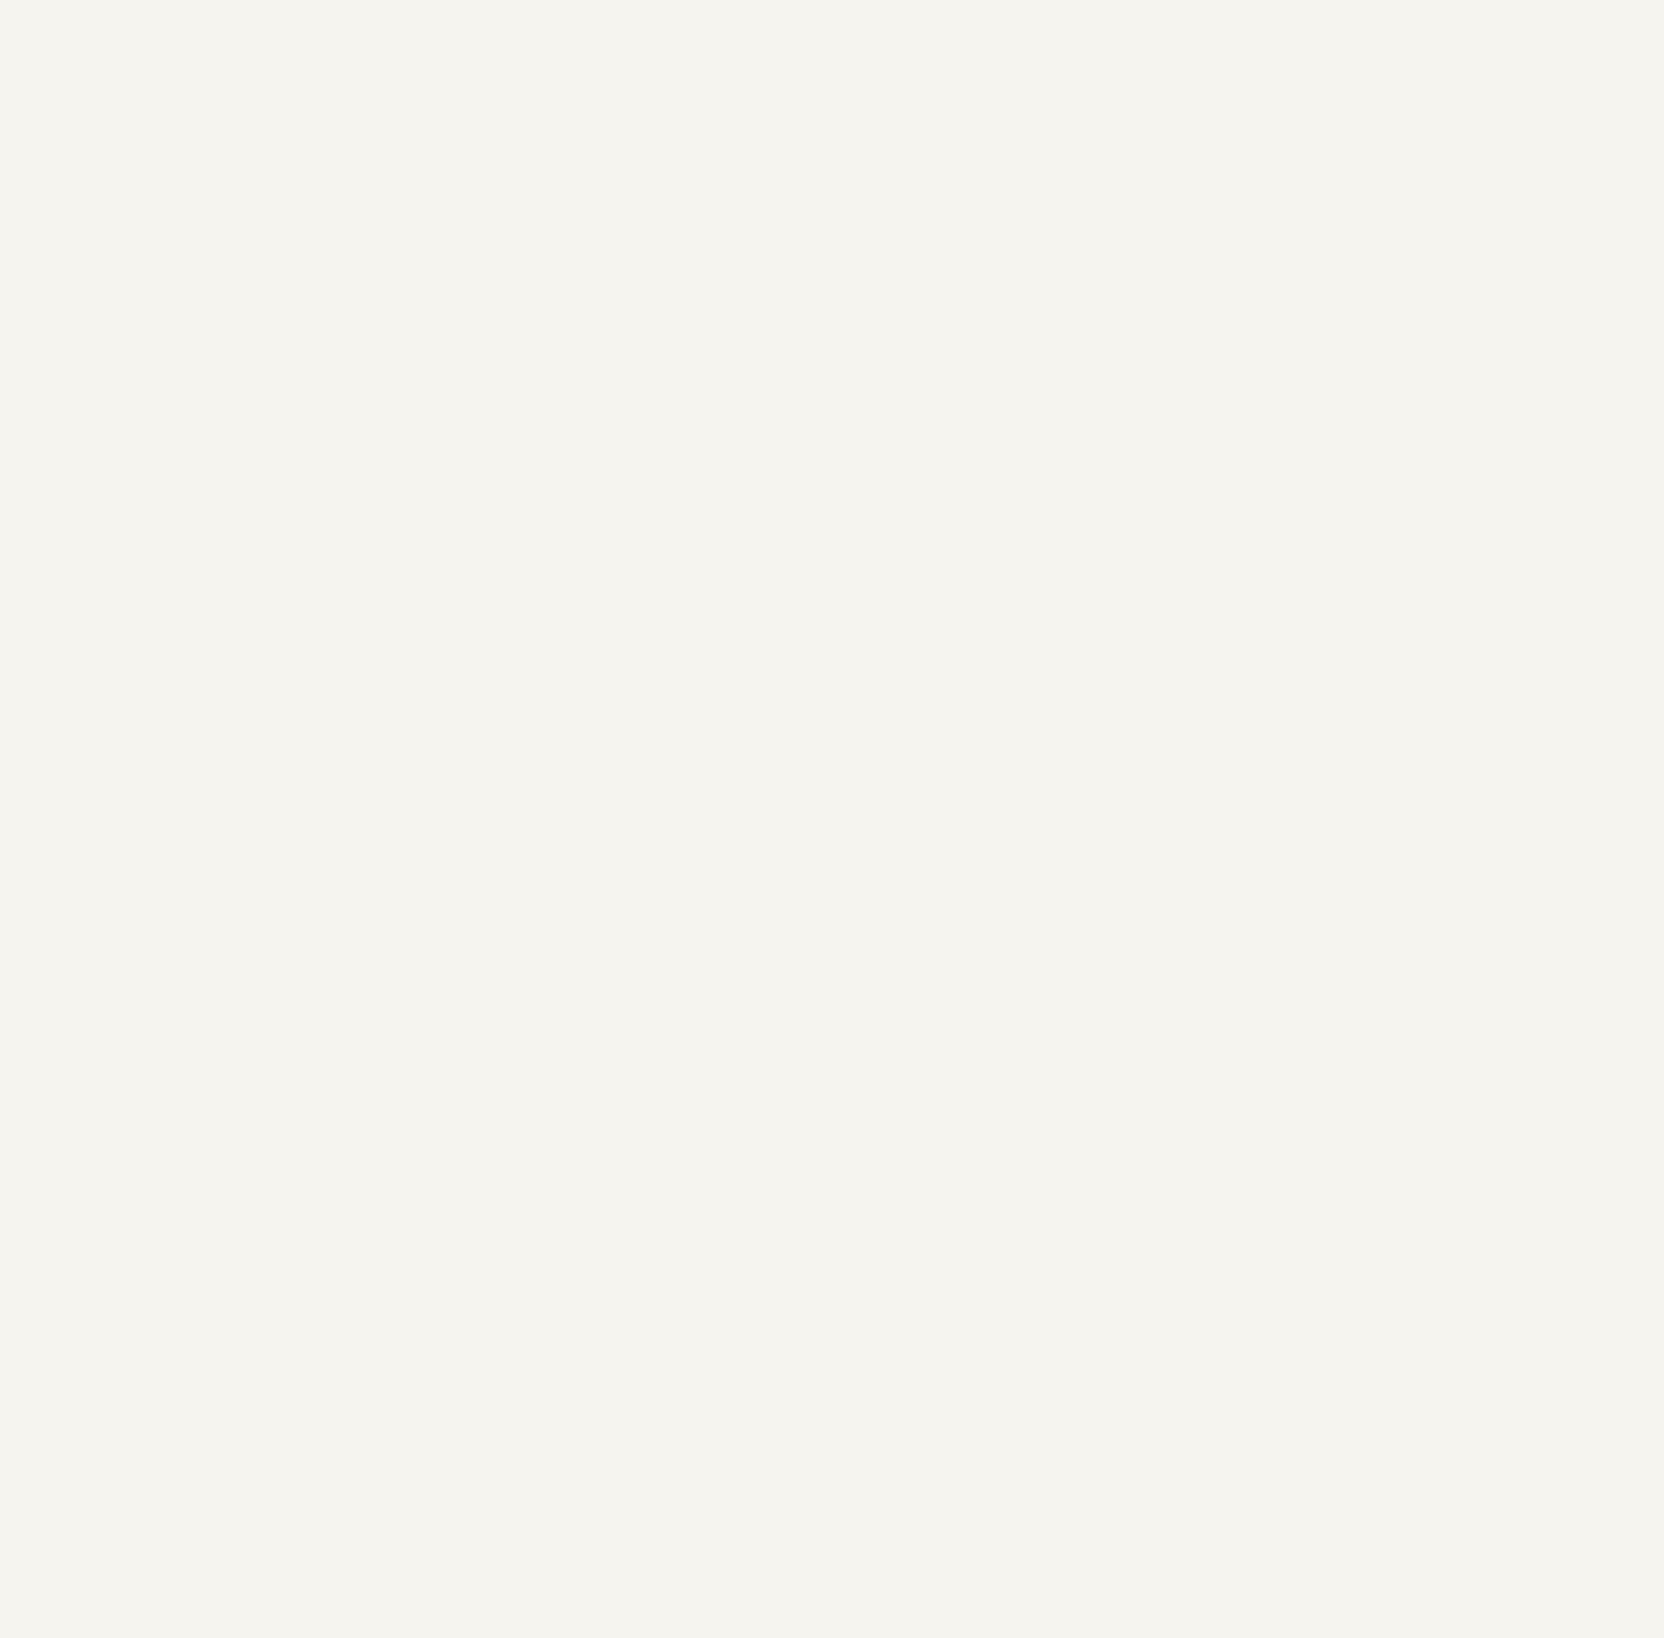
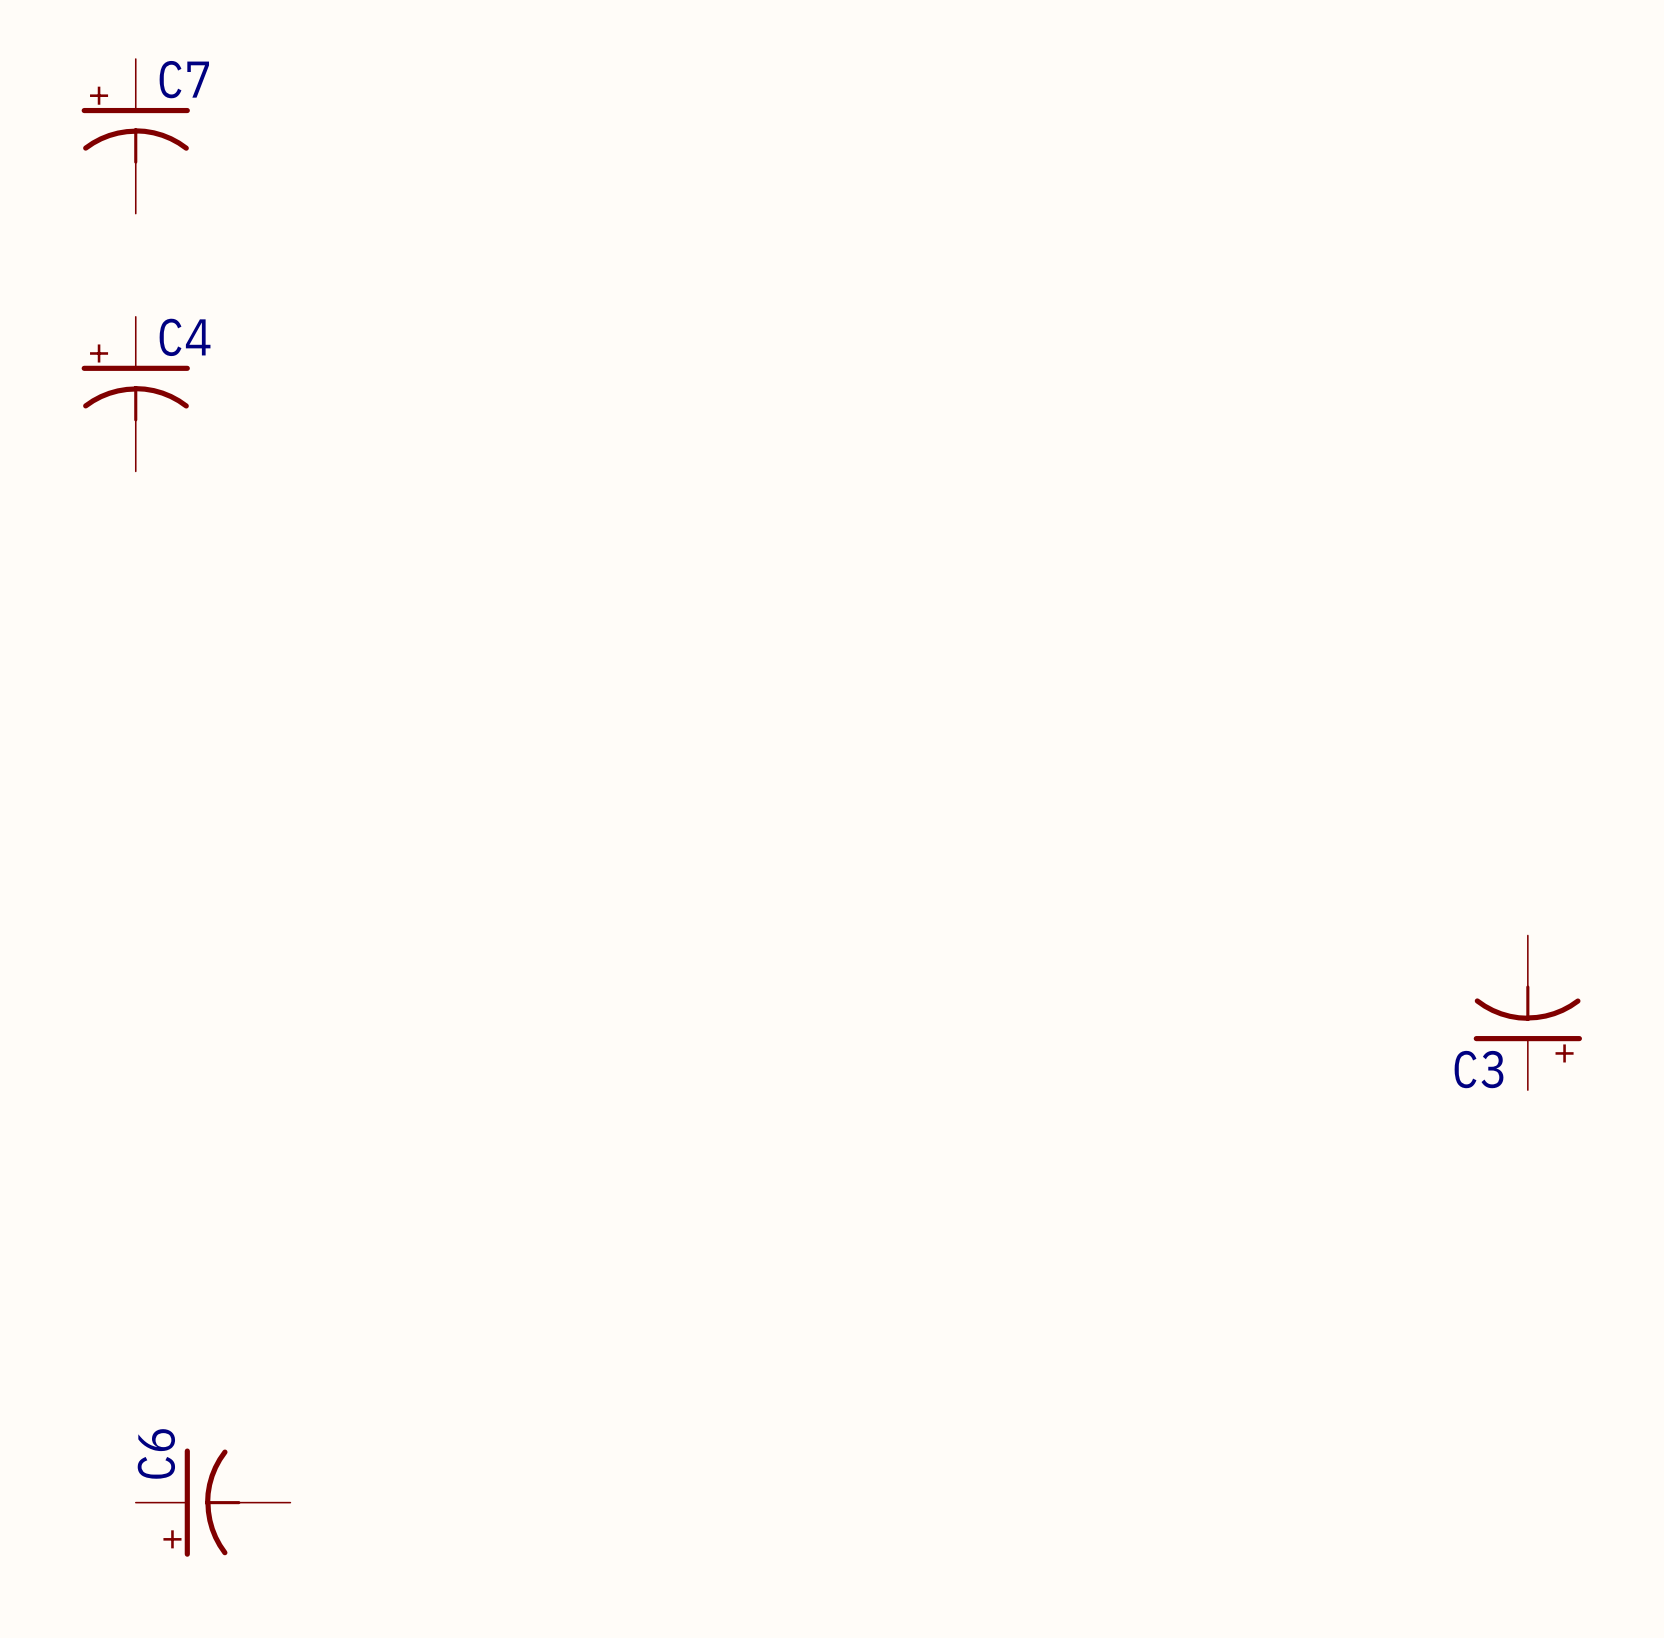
C7: none -> (135, 136)
C4: none -> (135, 394)
C3: none -> (1527, 1012)
C6: none -> (213, 1502)

